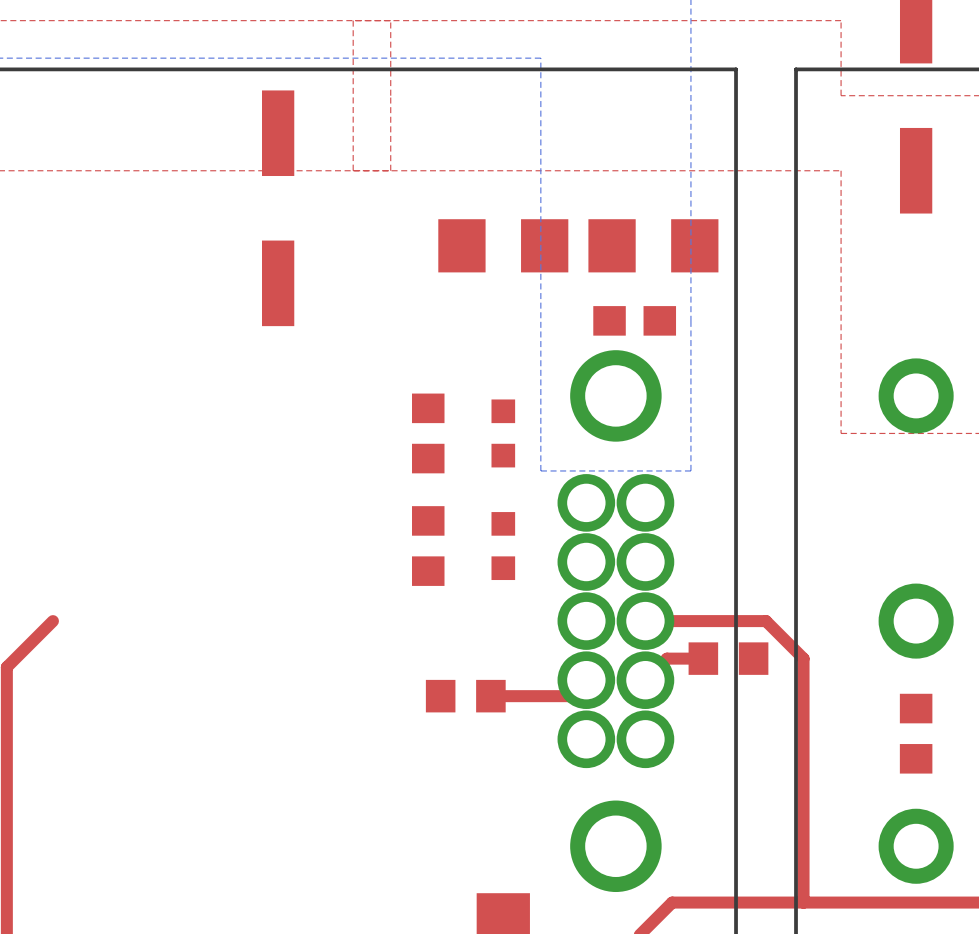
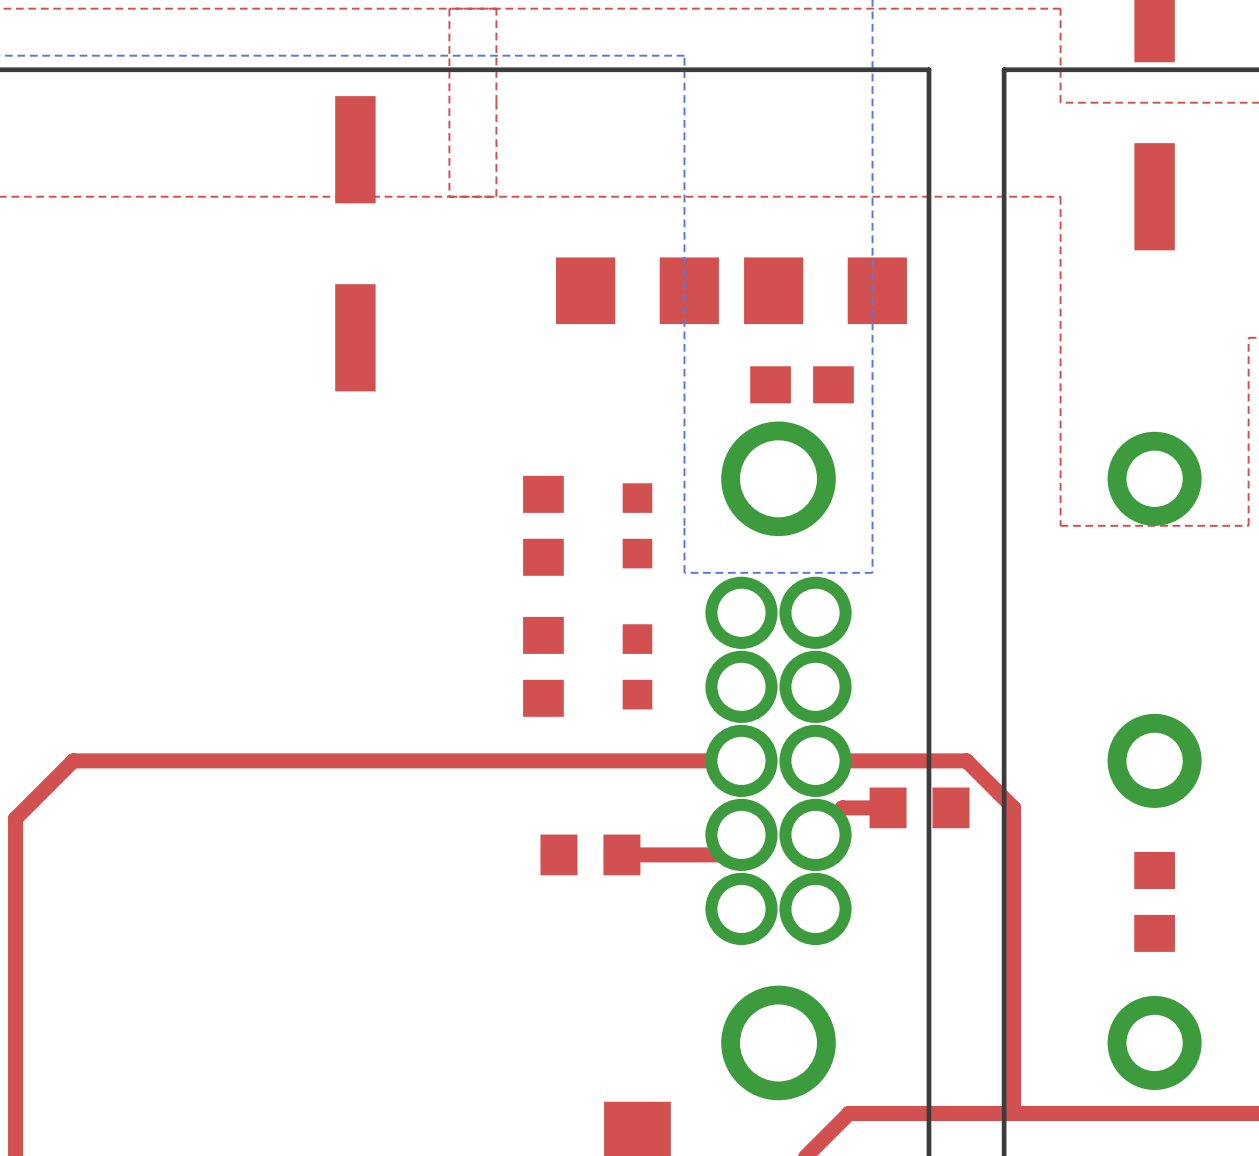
top track: none -> (741, 760) (73, 760)

